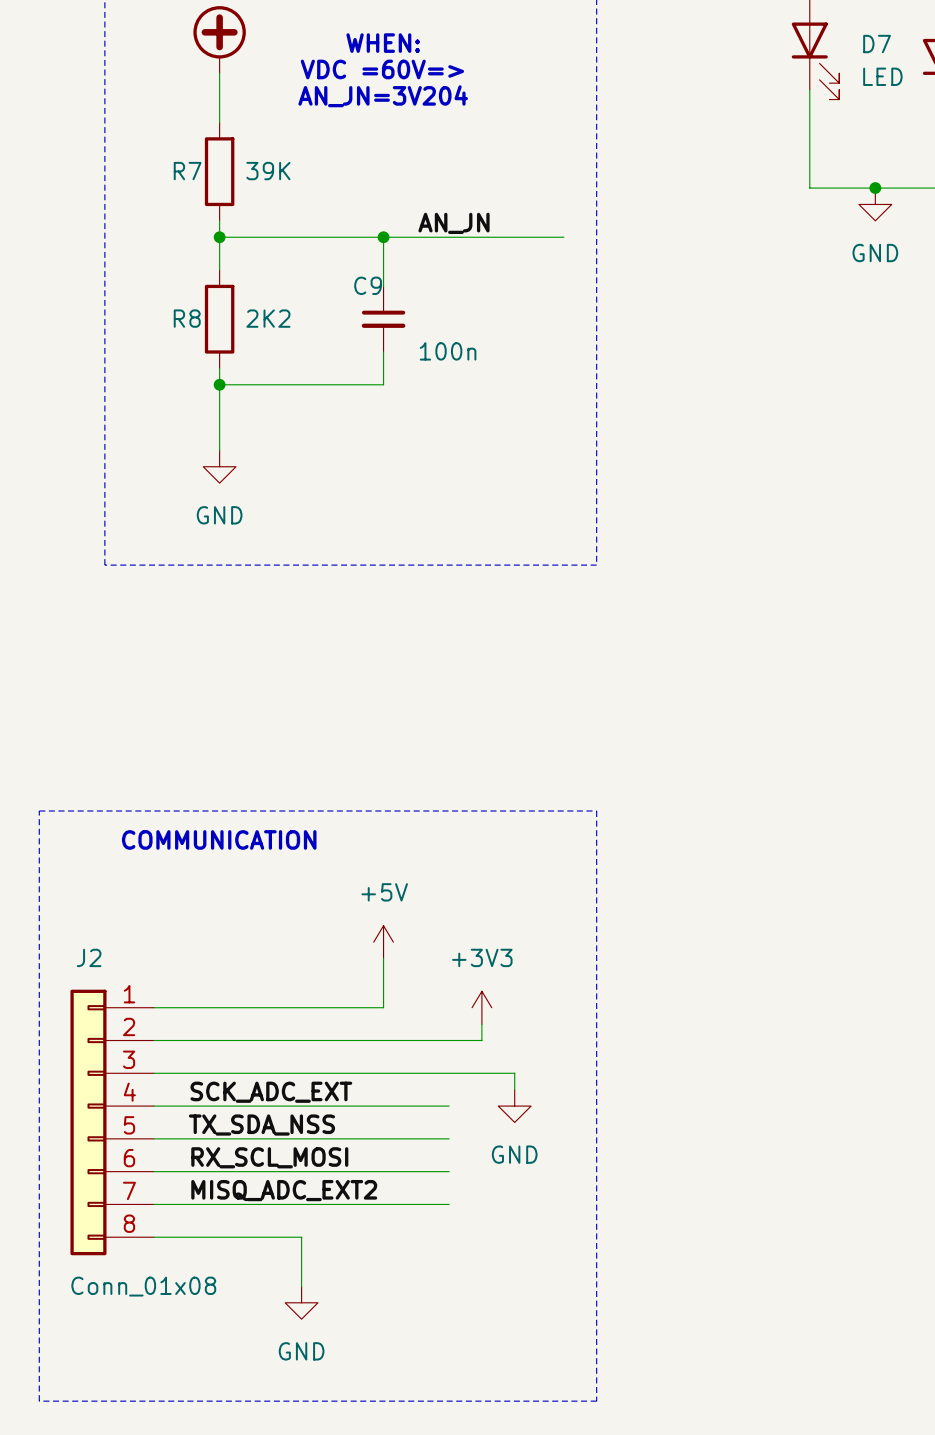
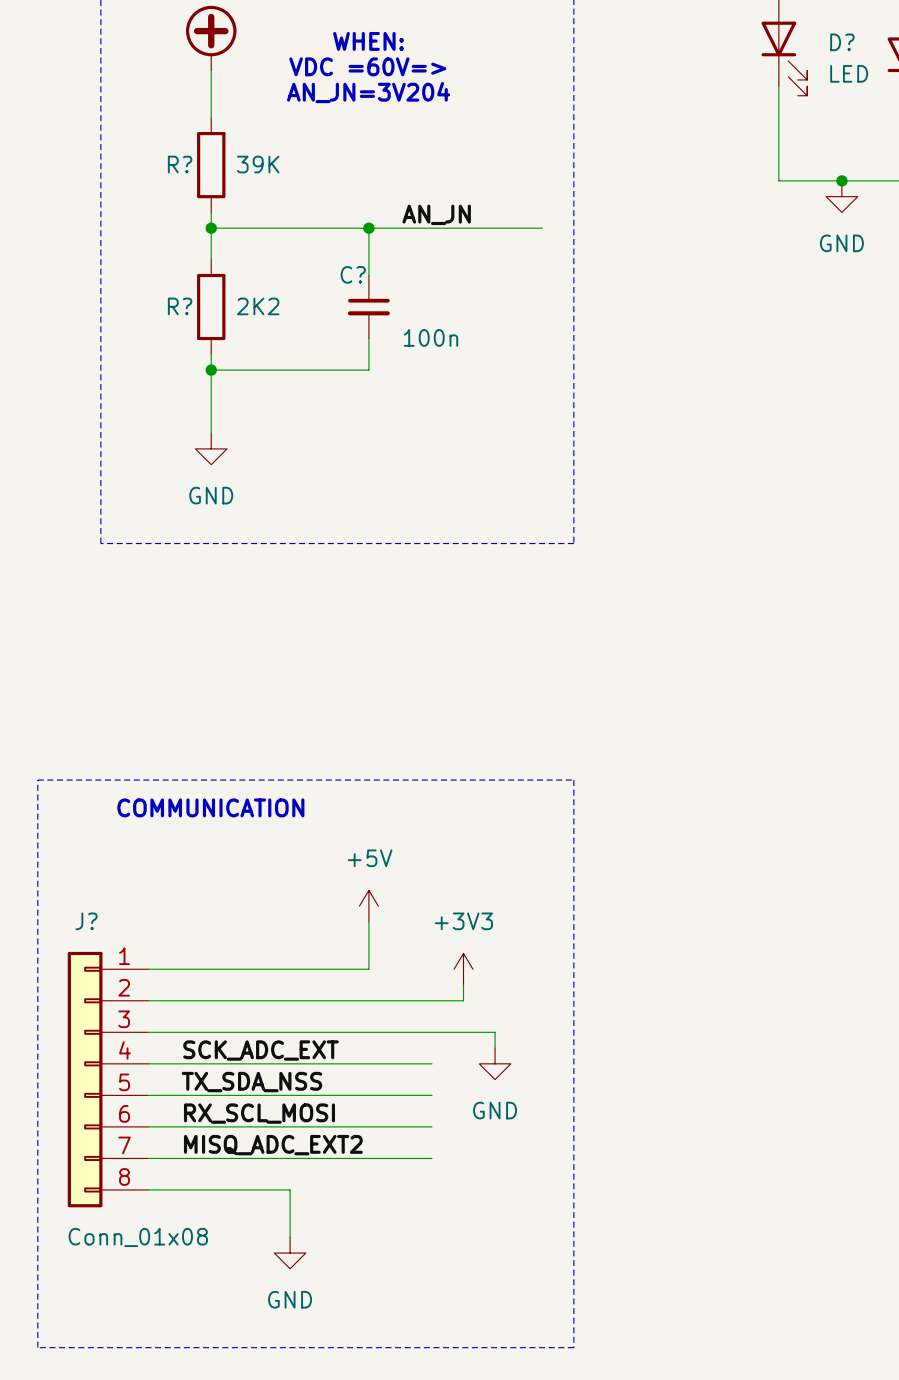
D7 name: D7 (877, 44) -> D? (842, 42)
R7 name: R7 (187, 171) -> R? (180, 164)
C9 name: C9 (368, 285) -> C? (353, 274)
R8 name: R8 (187, 318) -> R? (180, 306)
J2 name: J2 (89, 957) -> J? (86, 921)

